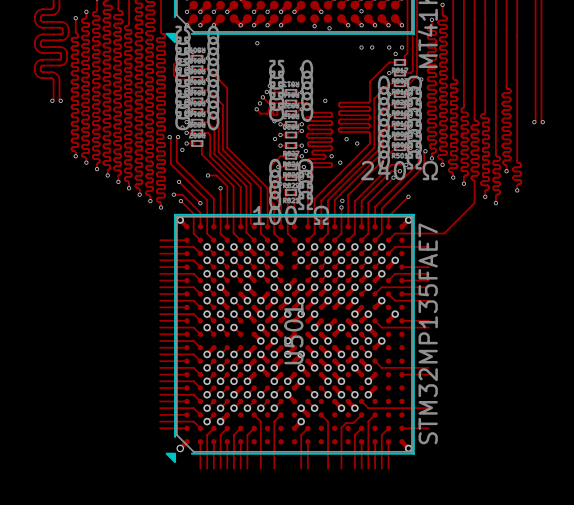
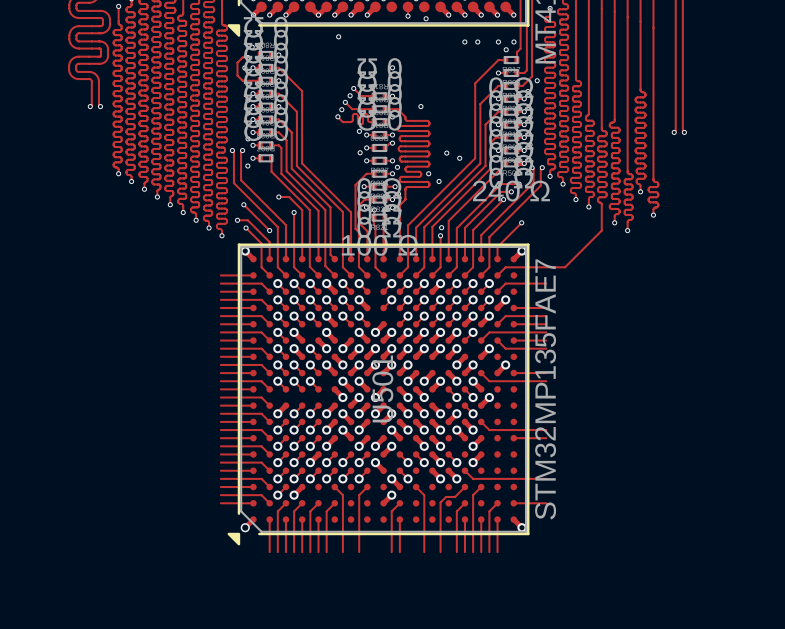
track: (370, 100) (338, 104) (340, 106) (368, 106) (370, 108) -> (475, 106) (475, 115)
track: (370, 109) (338, 112) (340, 115) (368, 115) (370, 116) -> (475, 116) (475, 126)
track: (370, 117) (338, 121) (340, 123) (368, 123) (370, 125) -> (475, 127) (475, 136)
track: (370, 126) (338, 129) (340, 132) (368, 132) (370, 133) -> (475, 137) (475, 146)

